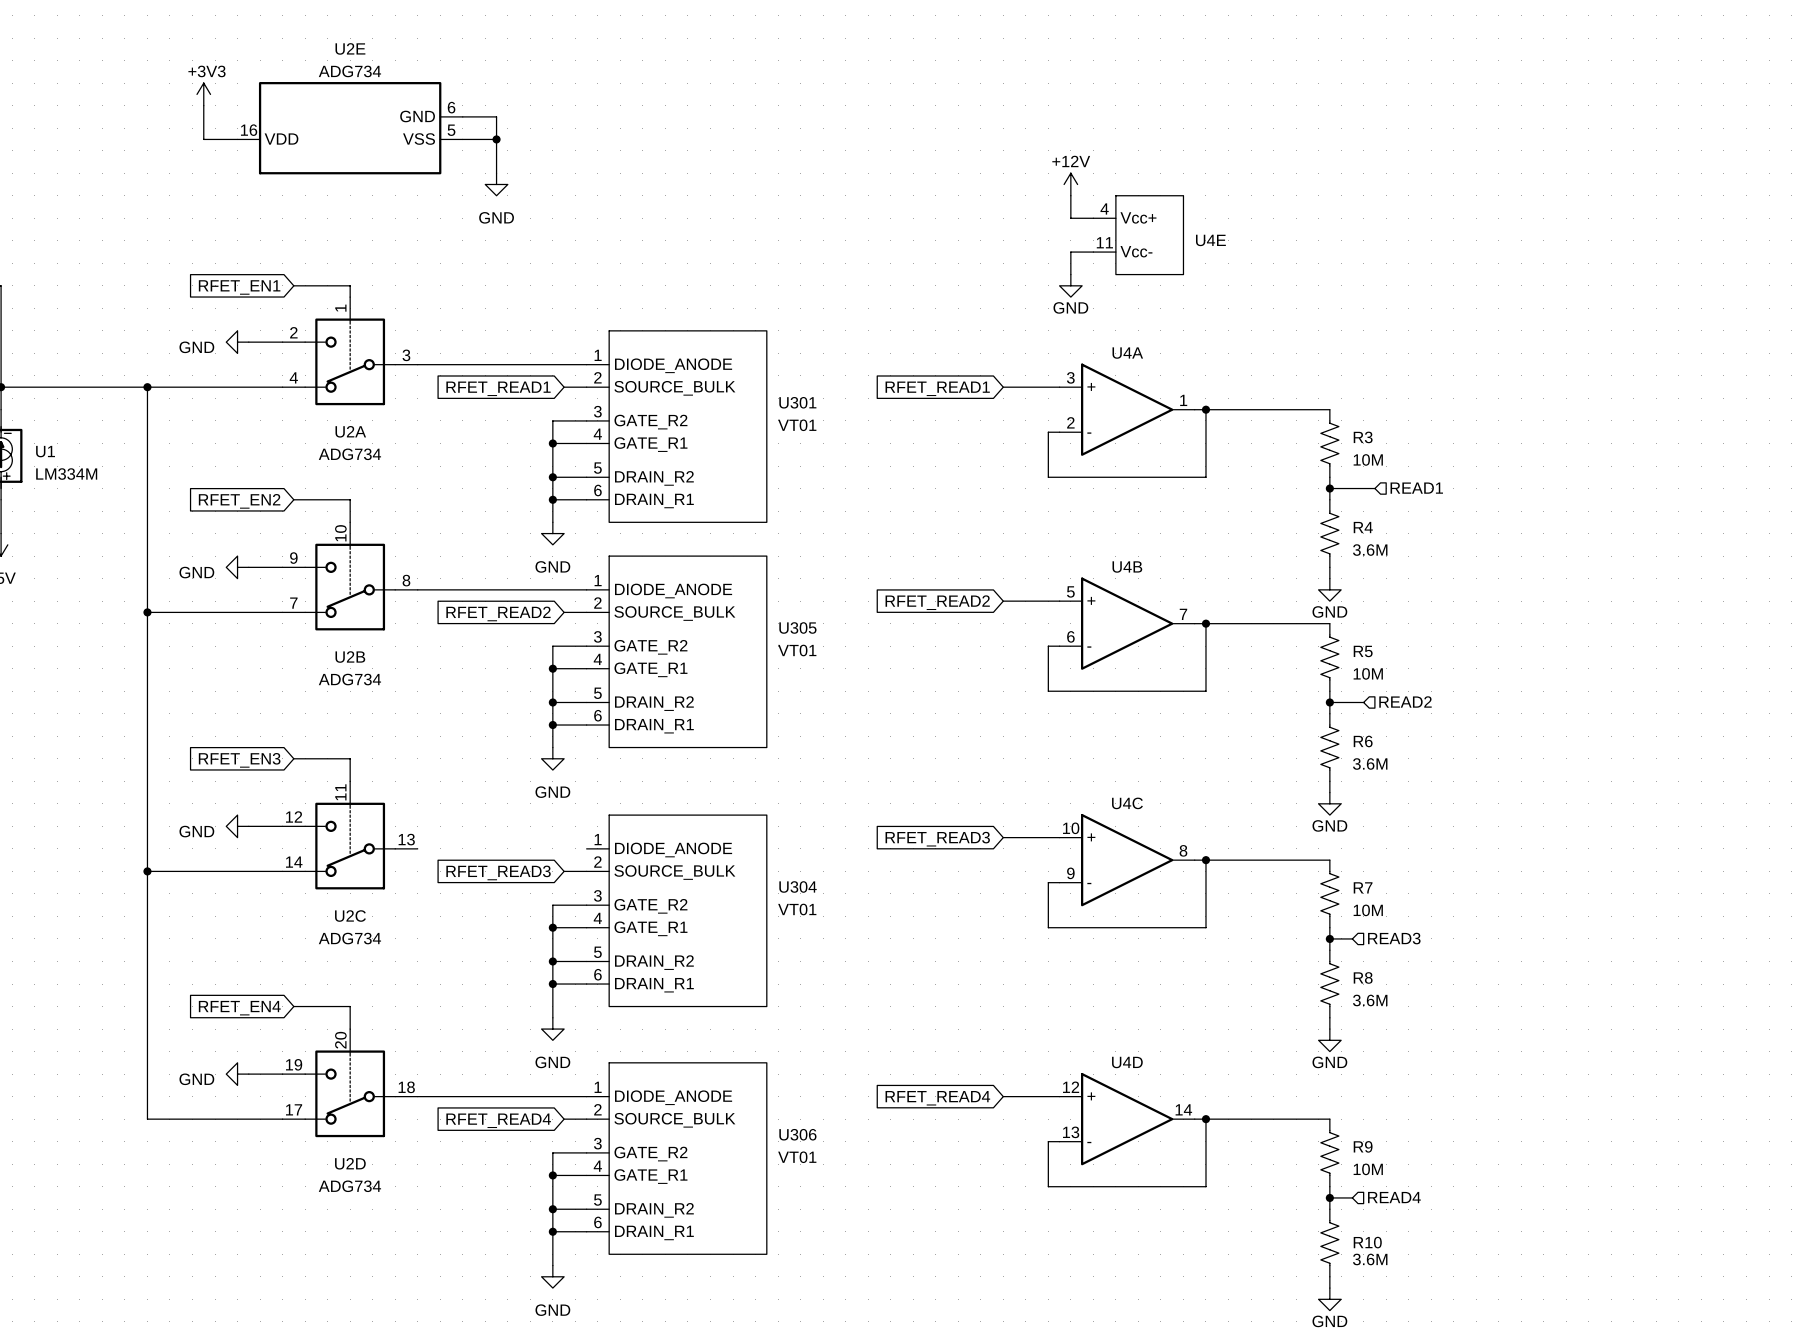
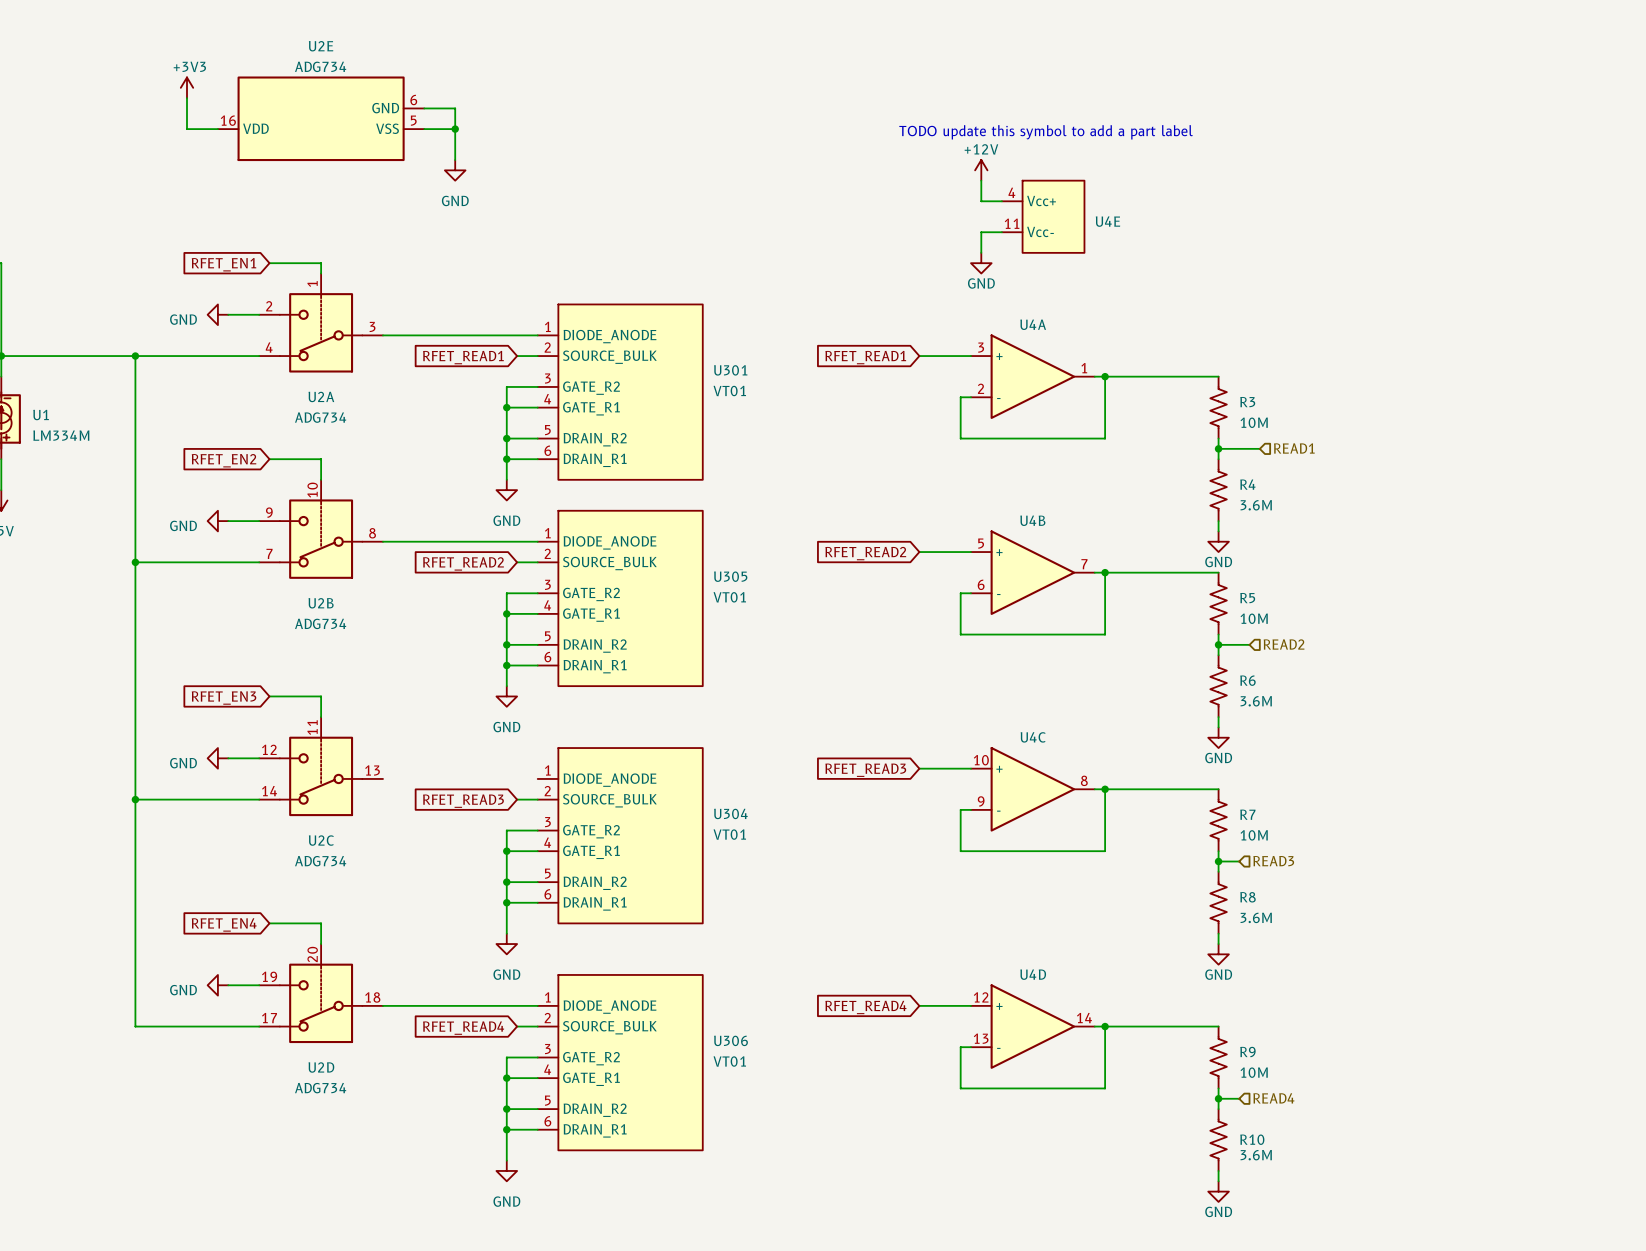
text: none -> TODO update this symbol to add a part label (1046, 132)

